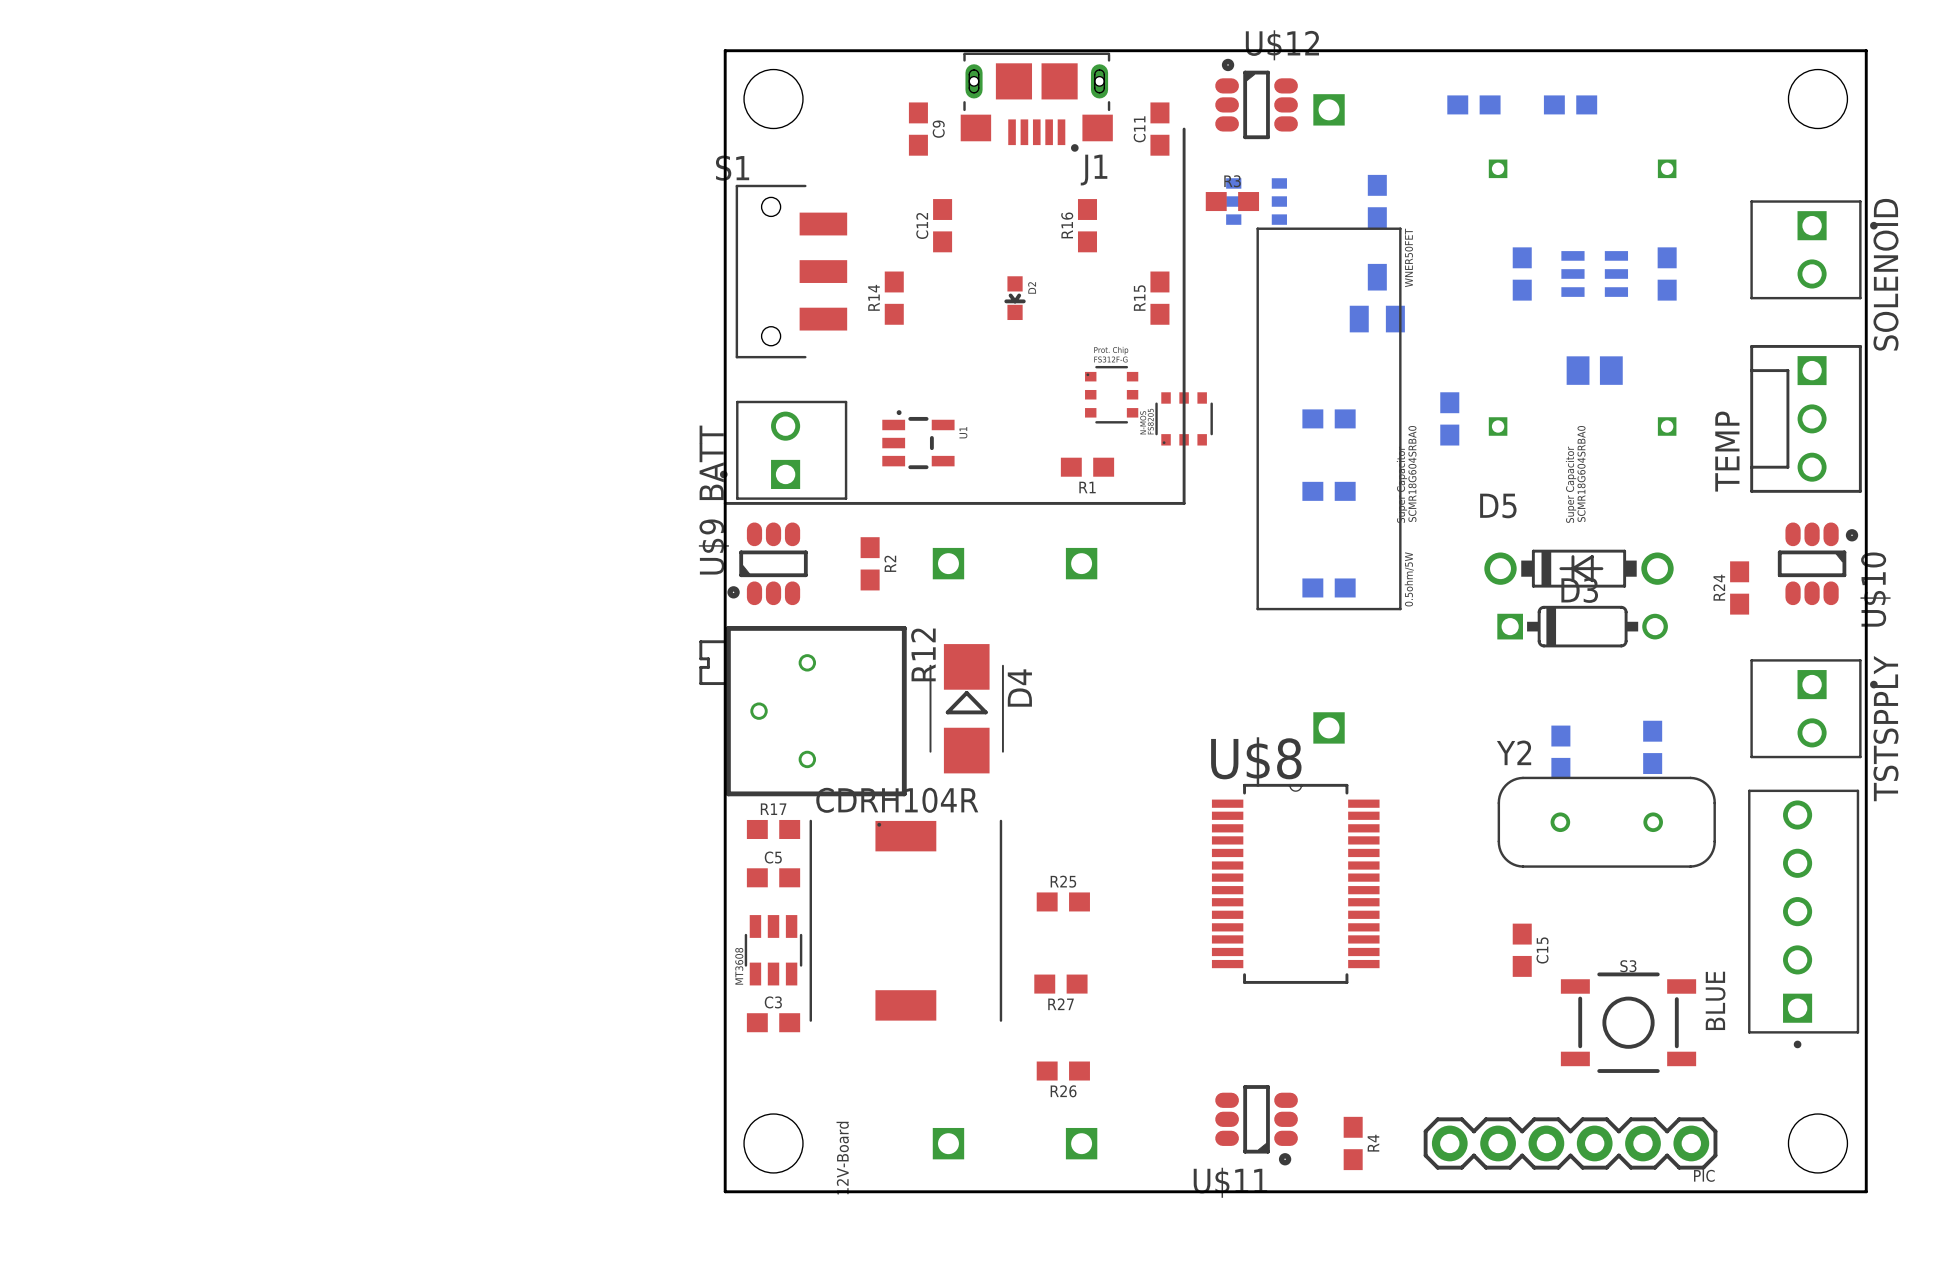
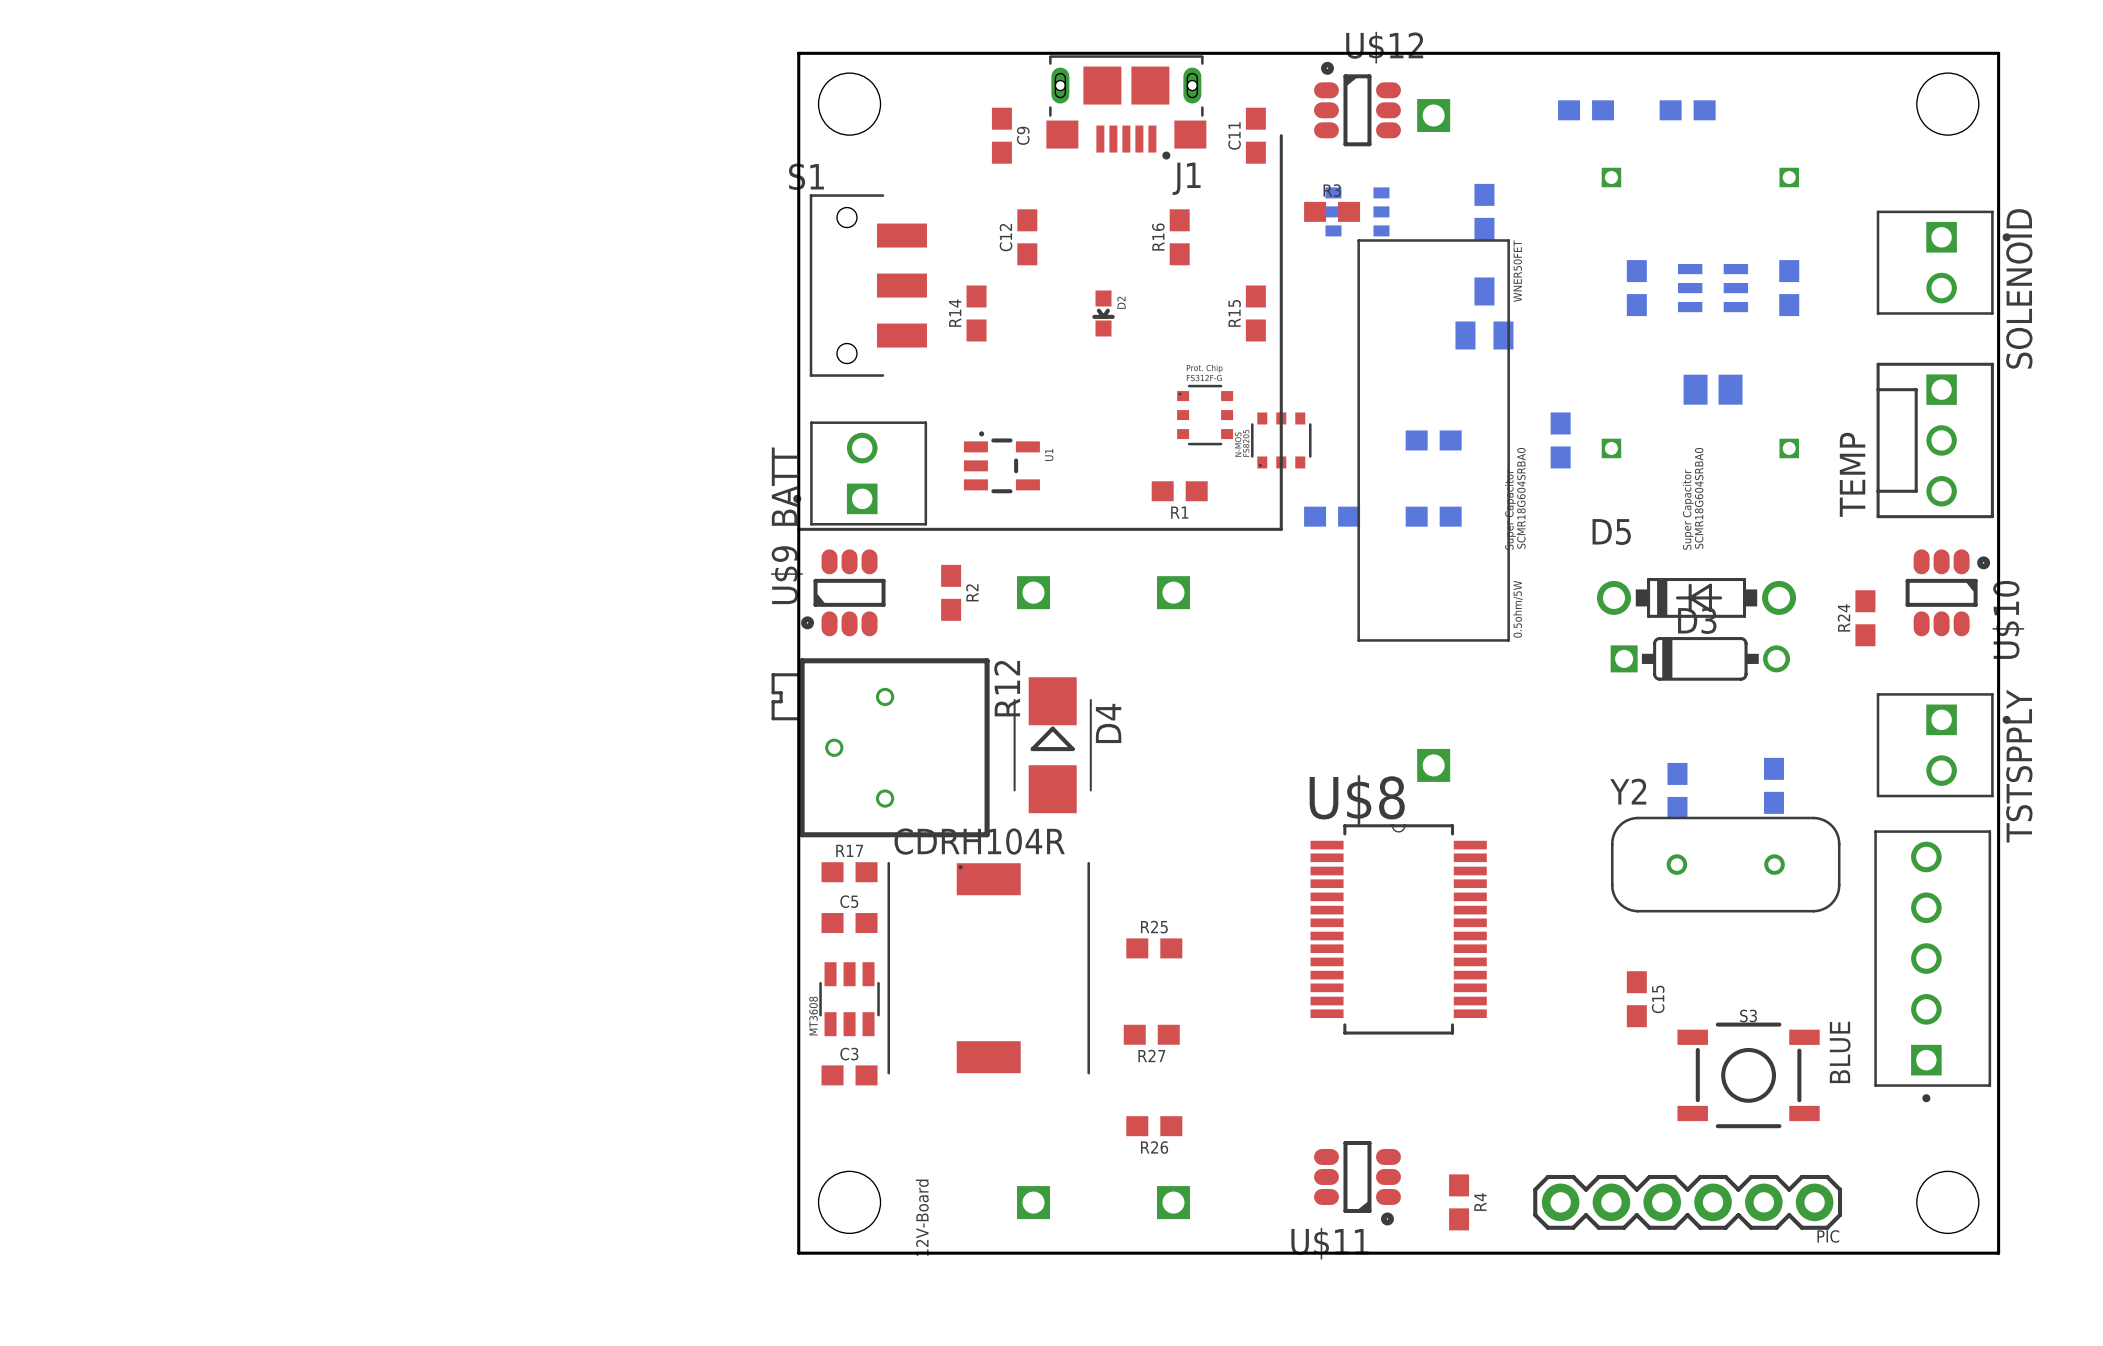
part position: (1329, 587) -> (1332, 516)

